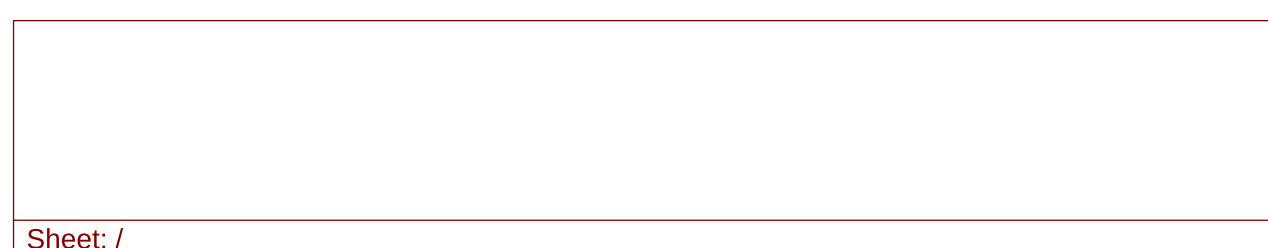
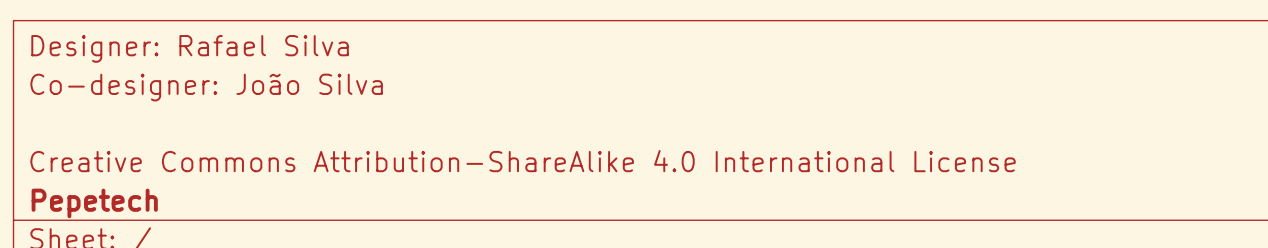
title block: none -> Designer: Rafael Silva (190, 48)
title block: none -> Co-designer: João Silva (206, 87)
title block: none -> Creative Commons Attribution-ShareAlike 4.0 International License (523, 161)
title block: none -> Pepetech (94, 203)

